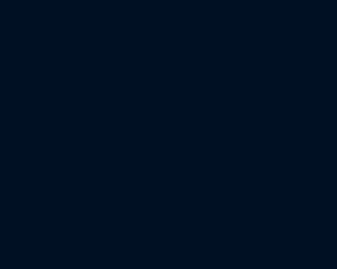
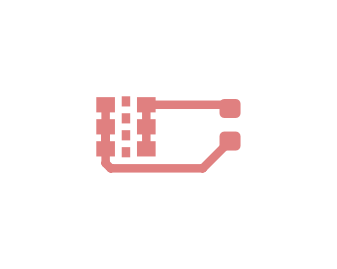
top track: none -> (105, 104) (105, 163) (110, 168) (202, 168) (230, 141)
top track: none -> (230, 108) (226, 104) (146, 104) (146, 148)
part: none -> (230, 124)
part: none -> (125, 126)

